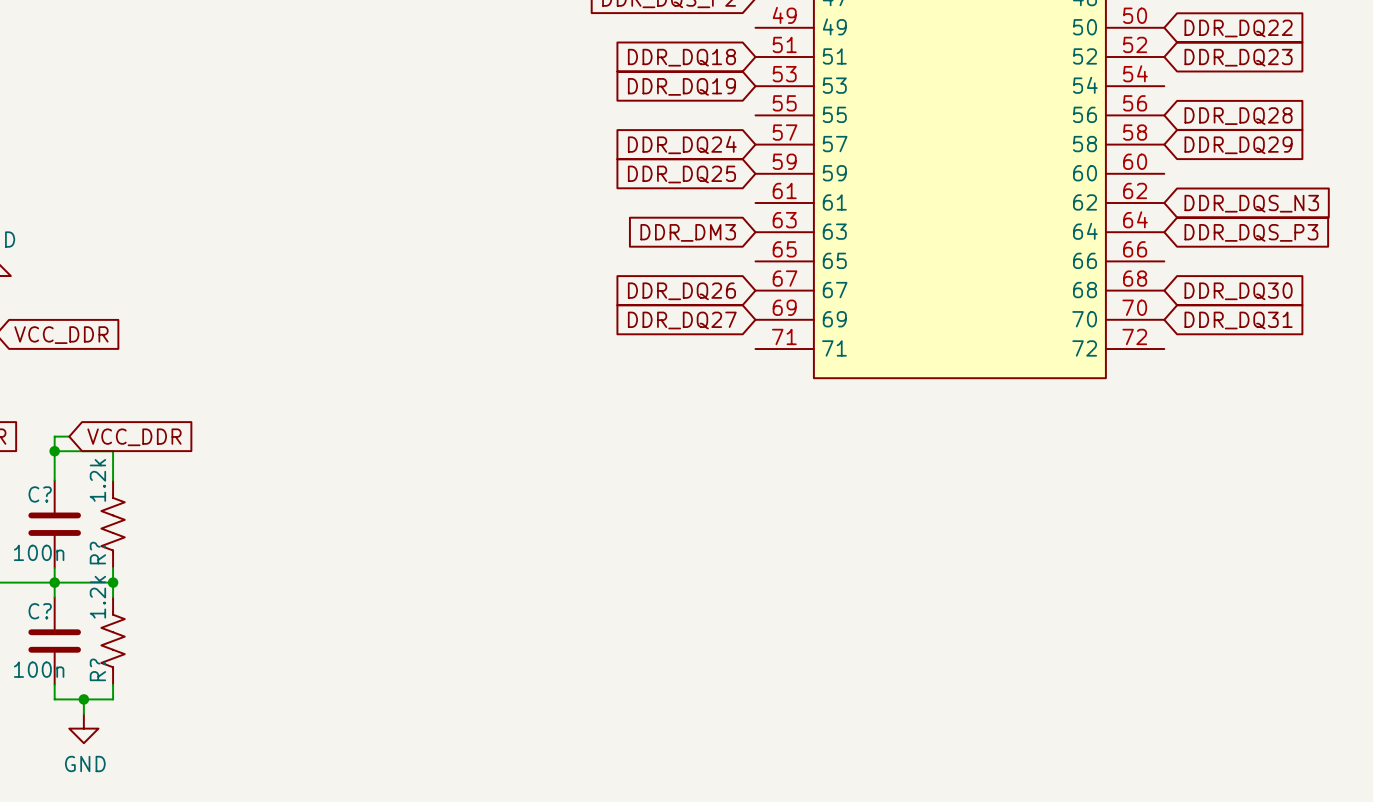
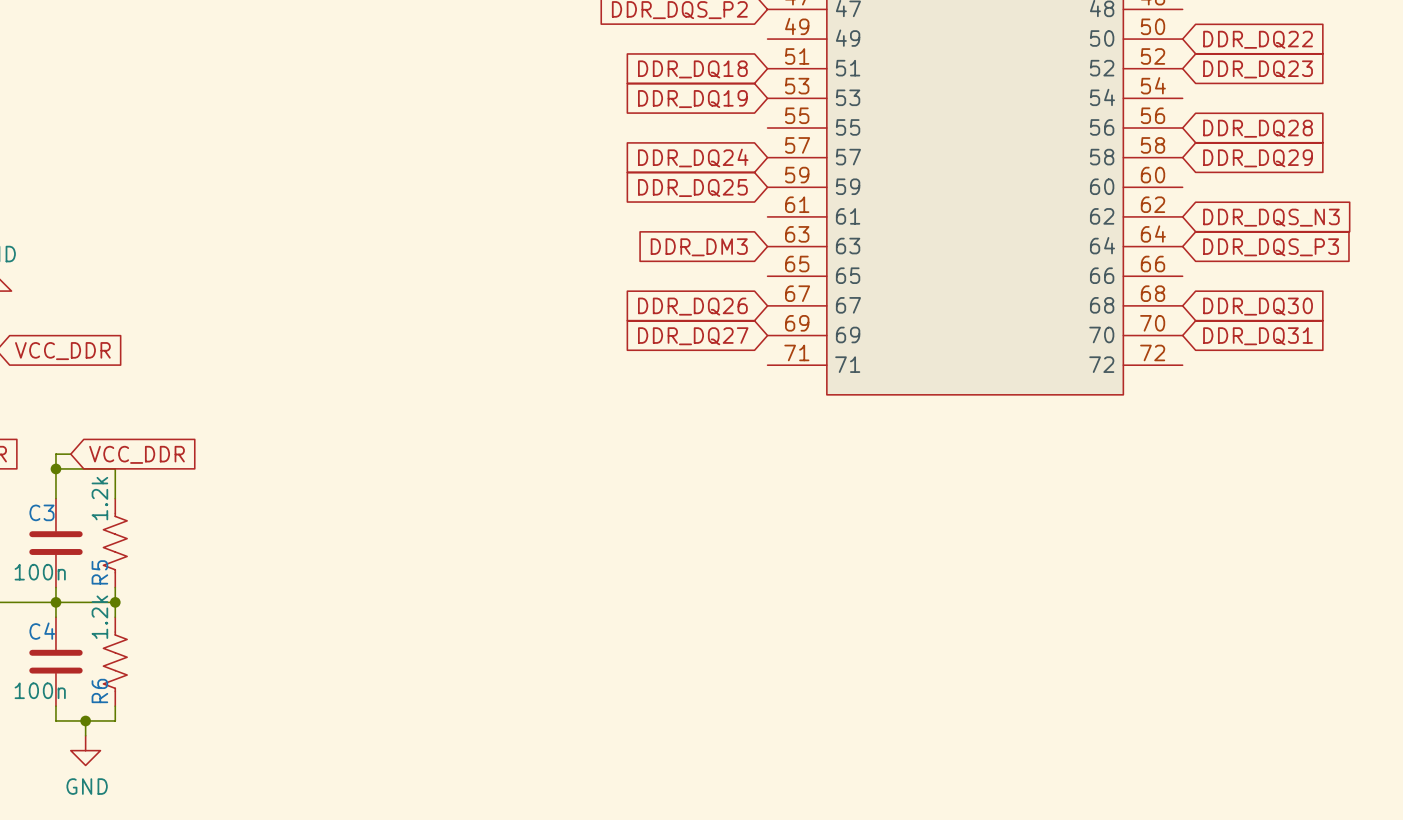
C? name: C? (40, 494) -> C3 (41, 512)
R? name: R? (97, 553) -> R5 (99, 572)
C? name: C? (40, 611) -> C4 (42, 631)
R? name: R? (97, 669) -> R6 (99, 690)

